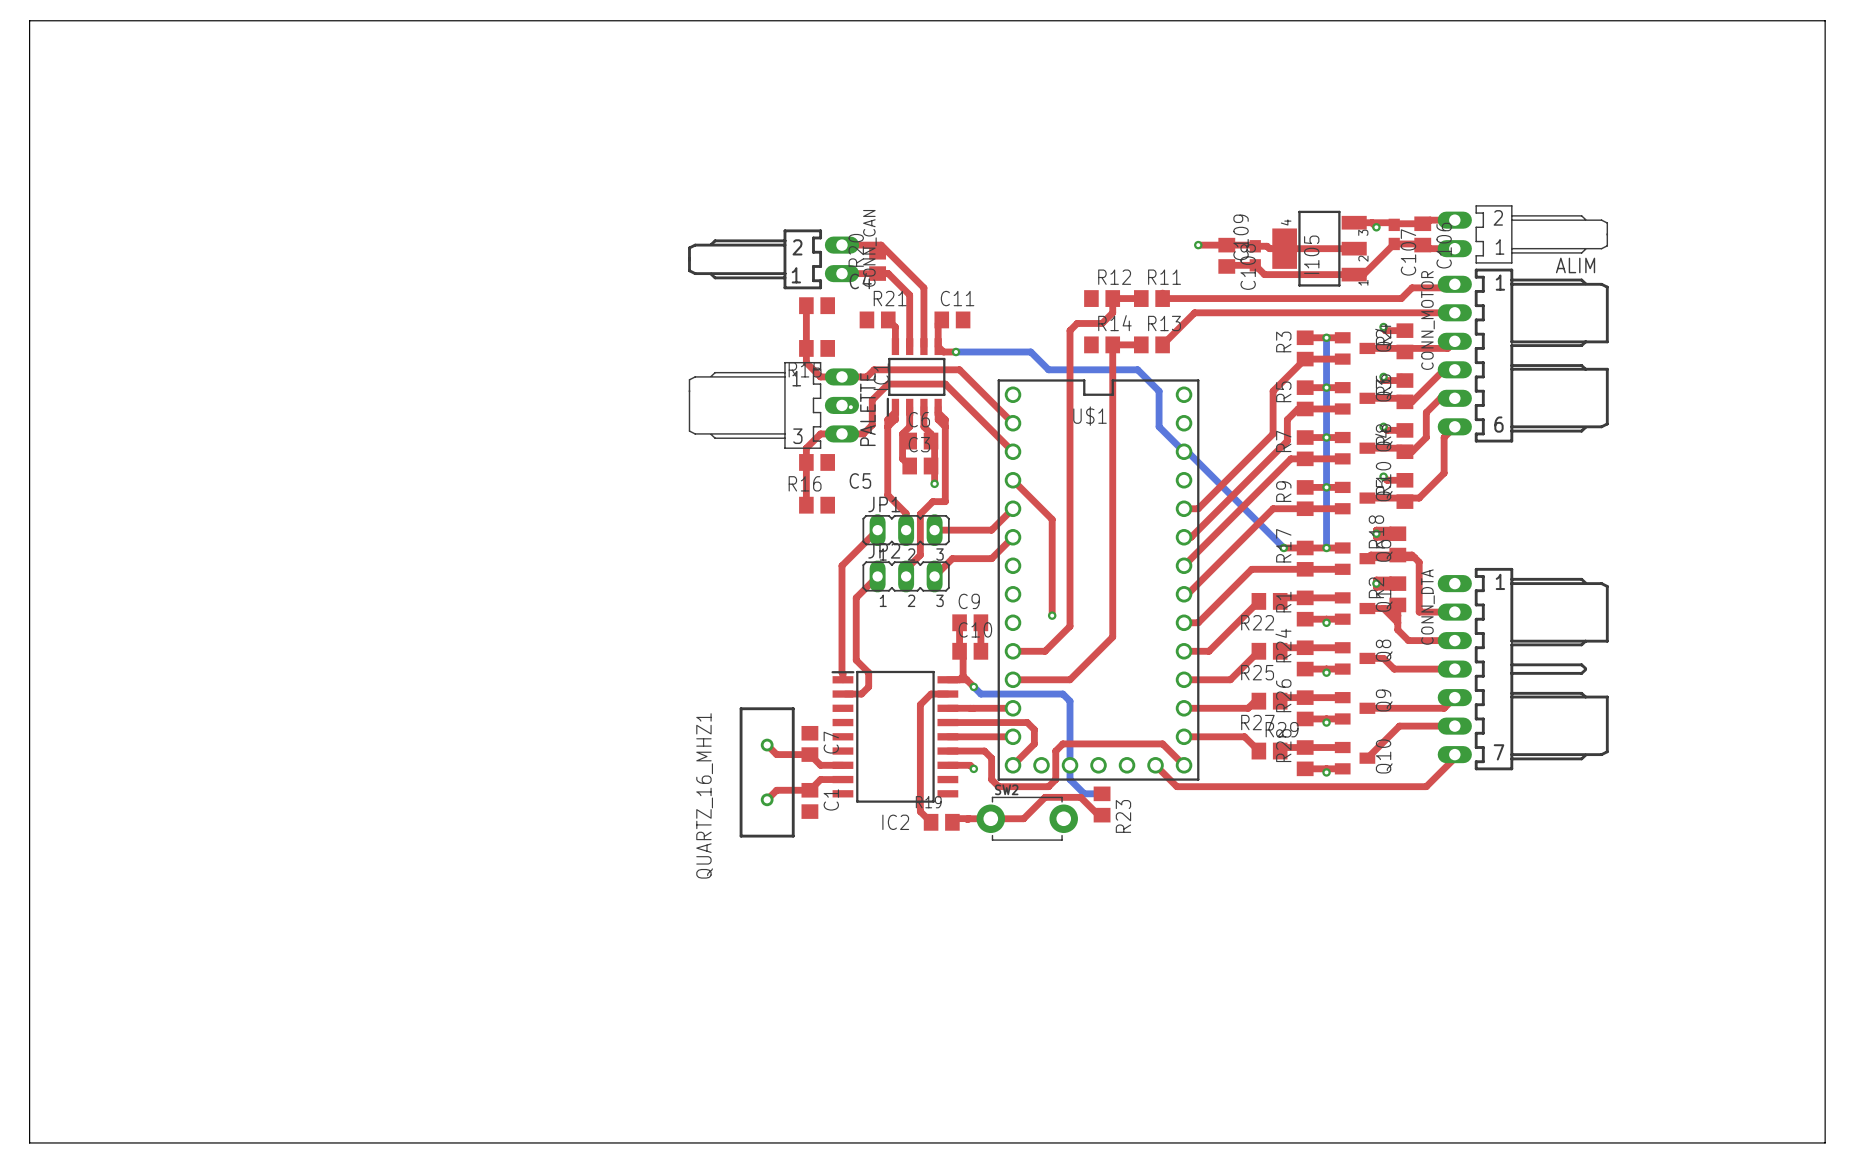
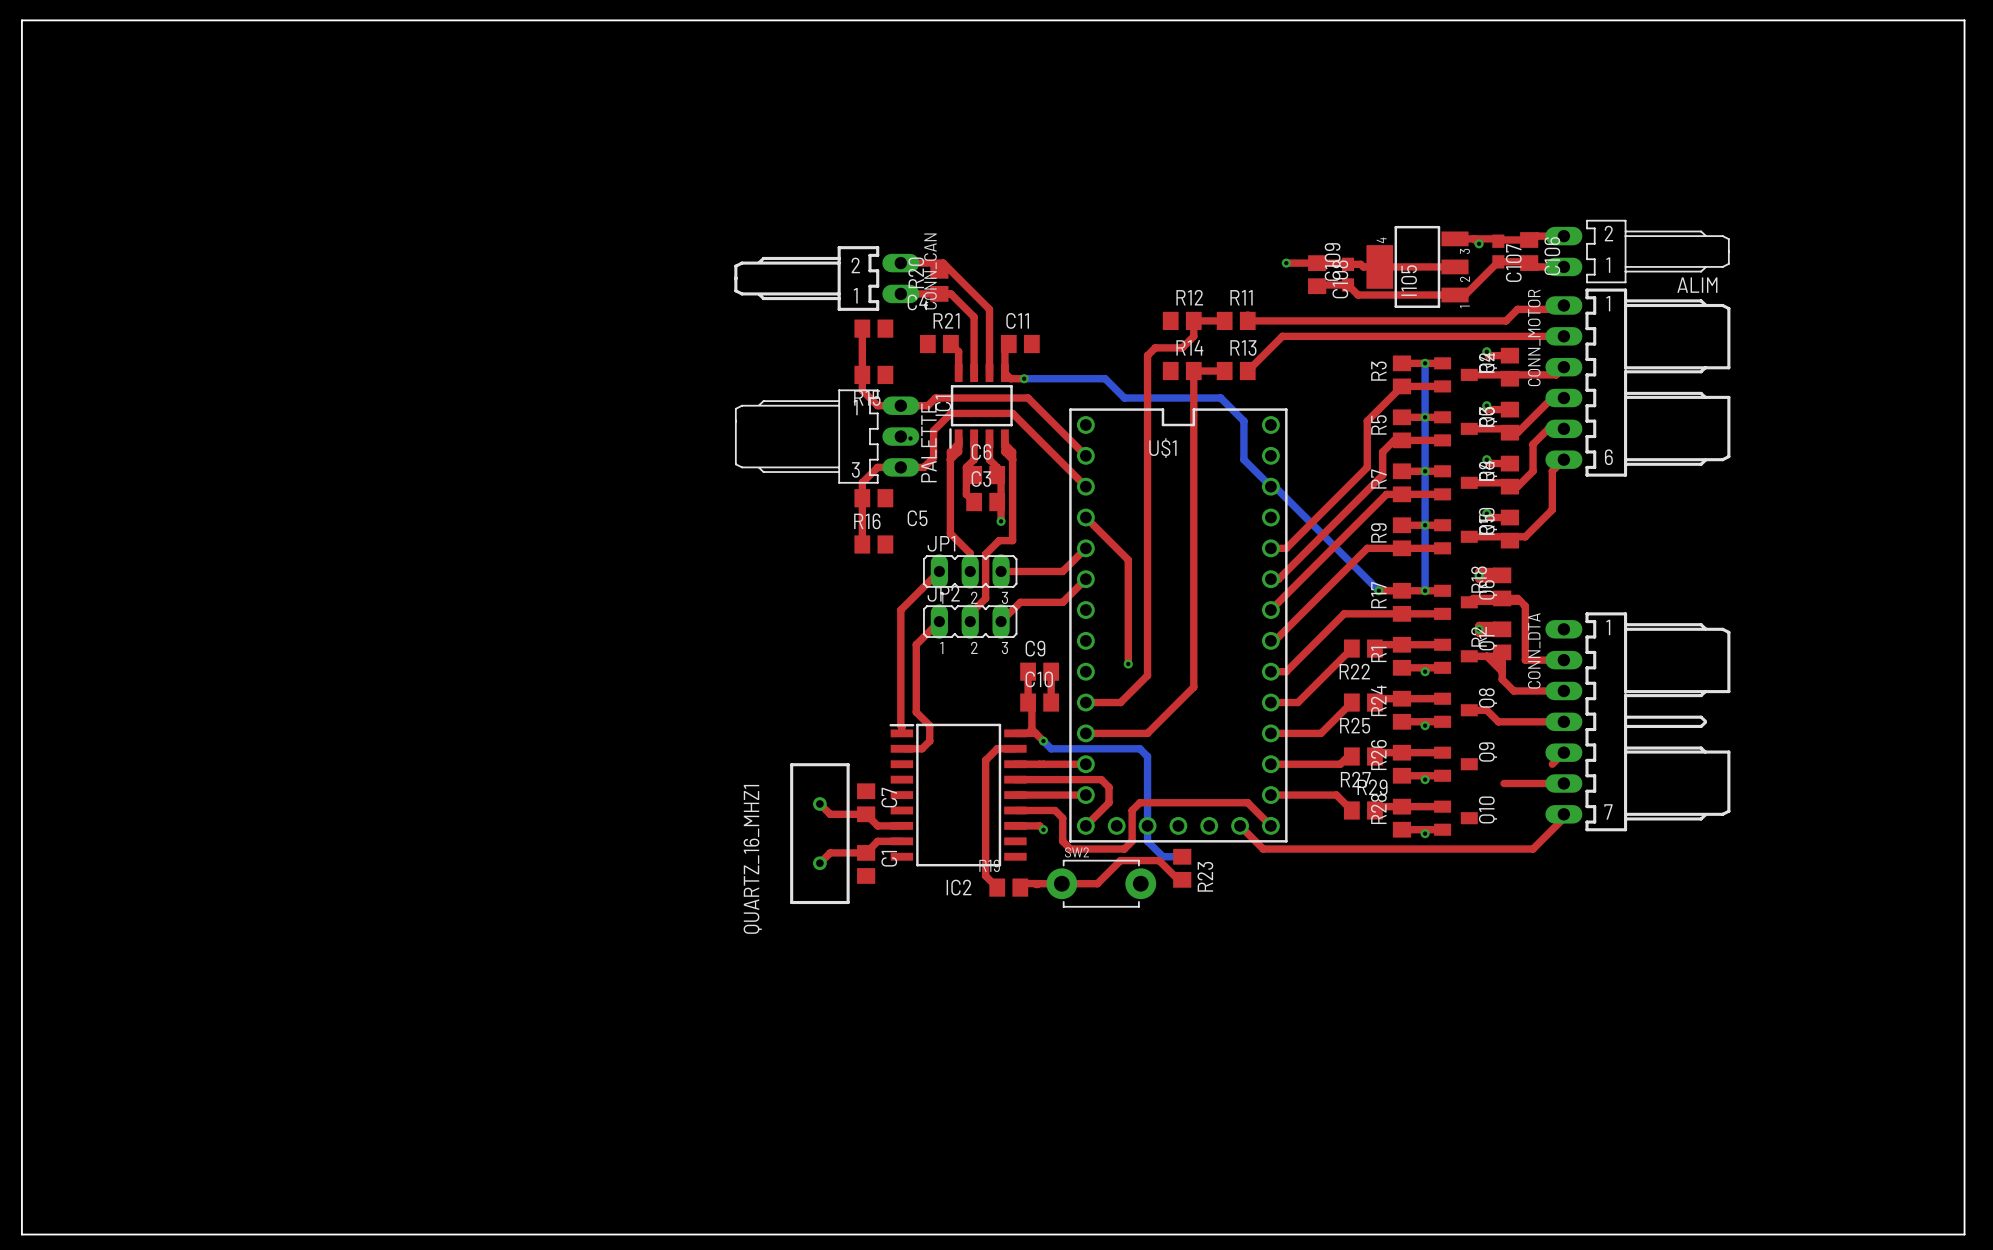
top track: (1367, 708) (1444, 708) -> none
top track: (1399, 726) (1367, 758) -> none

